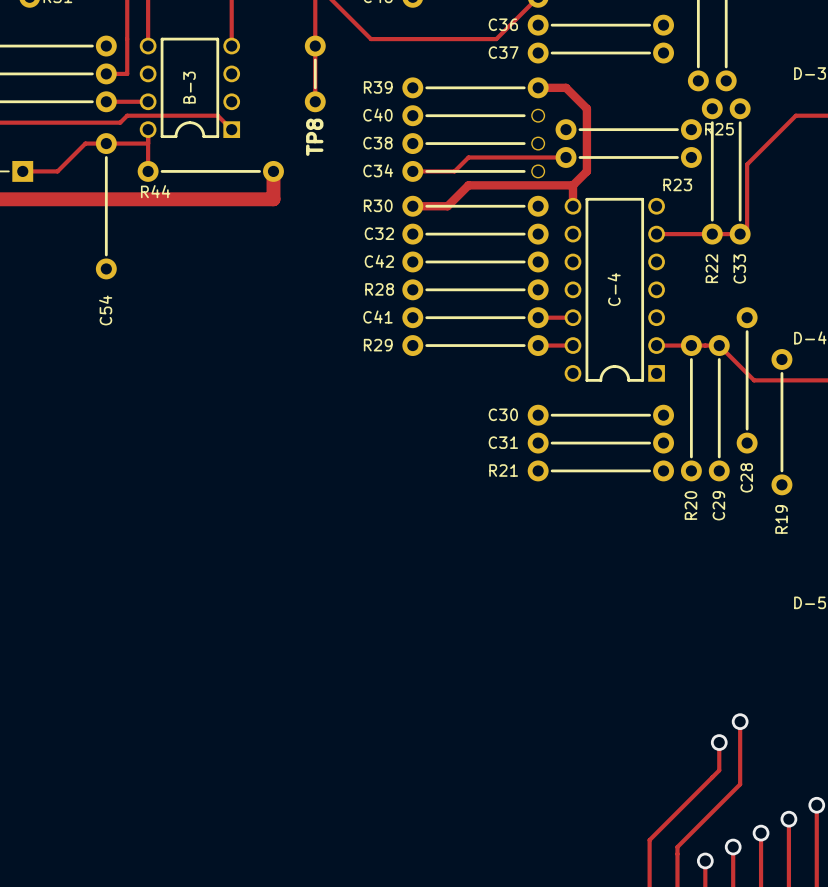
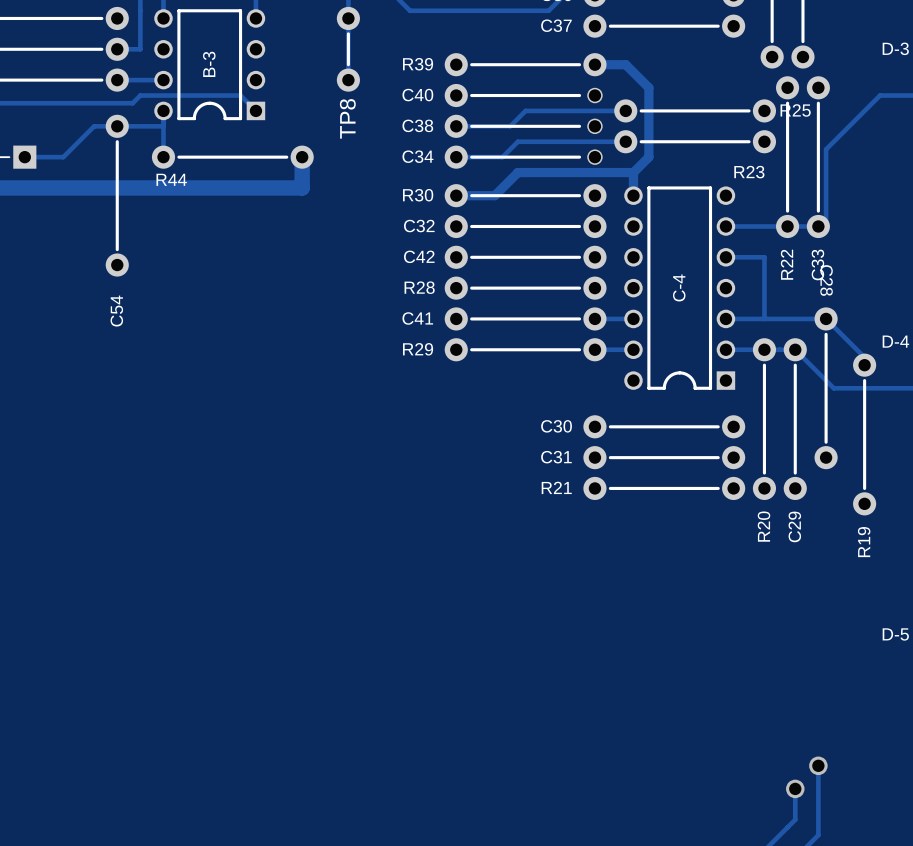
track: none -> (625, 110) (525, 110) (510, 126) (456, 126)
track: none -> (725, 257) (764, 257) (764, 318)
track: none -> (725, 318) (826, 318) (864, 357) (864, 365)
C28 name rotation: 0° (746, 477) -> 180° (826, 280)
C28 name position: C28 (746, 477) -> C28 (826, 280)

